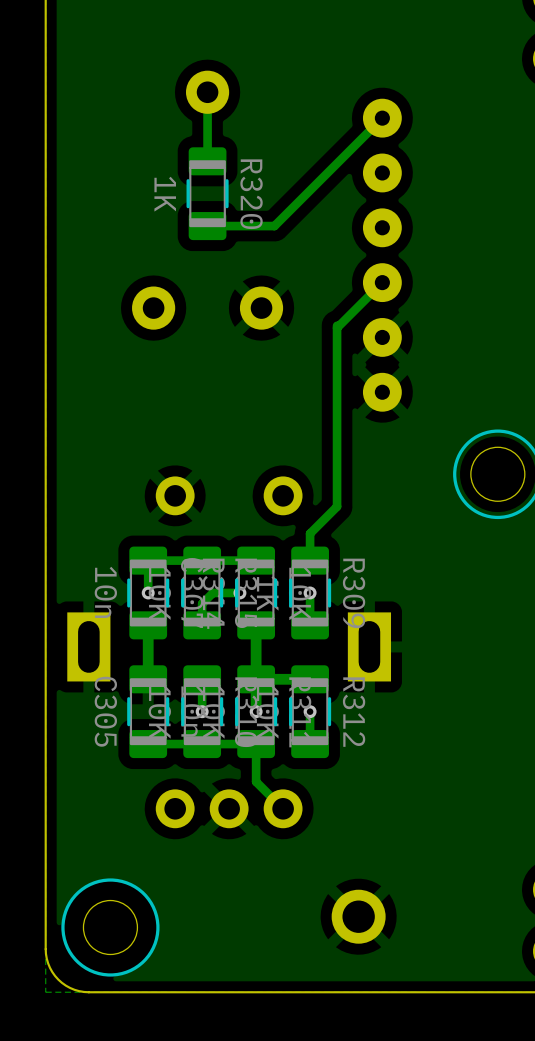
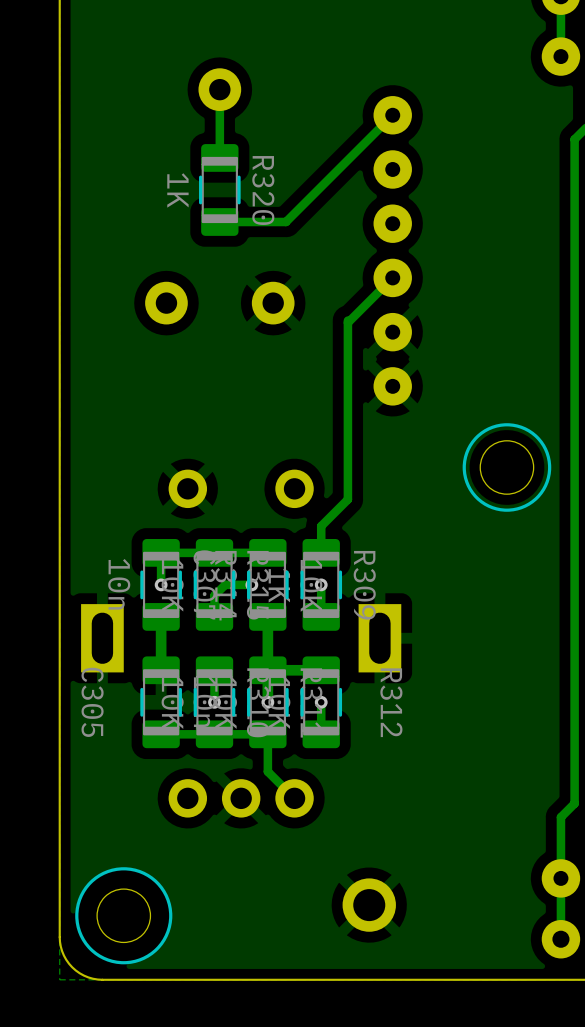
C305 name position: C305 (105, 711) -> C305 (92, 702)
R312 name position: R312 (354, 712) -> R312 (391, 702)

